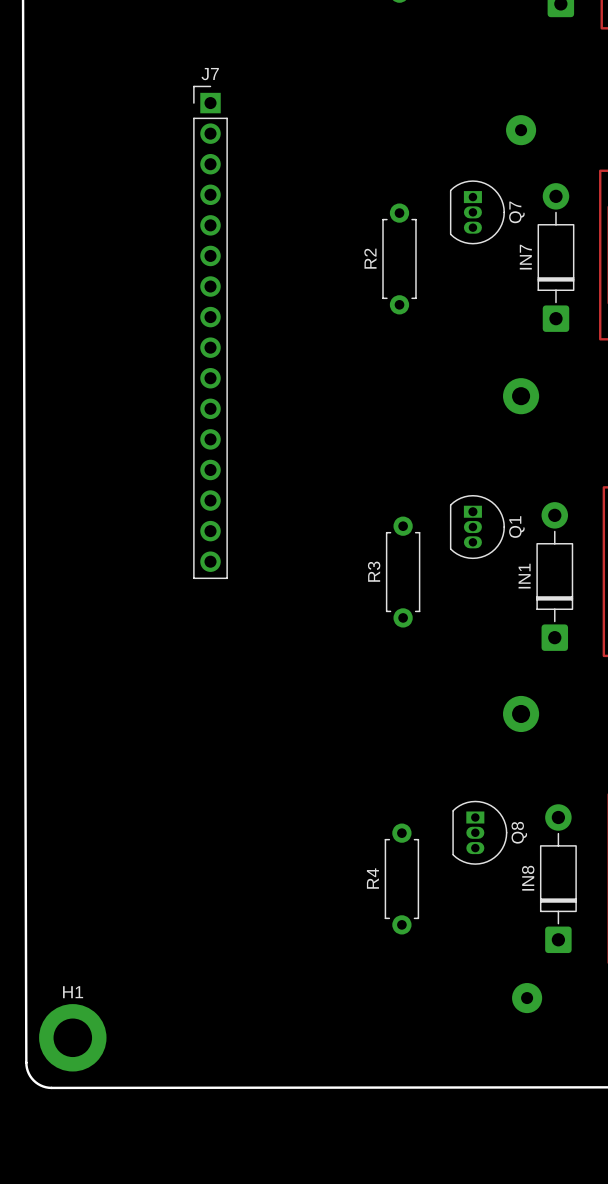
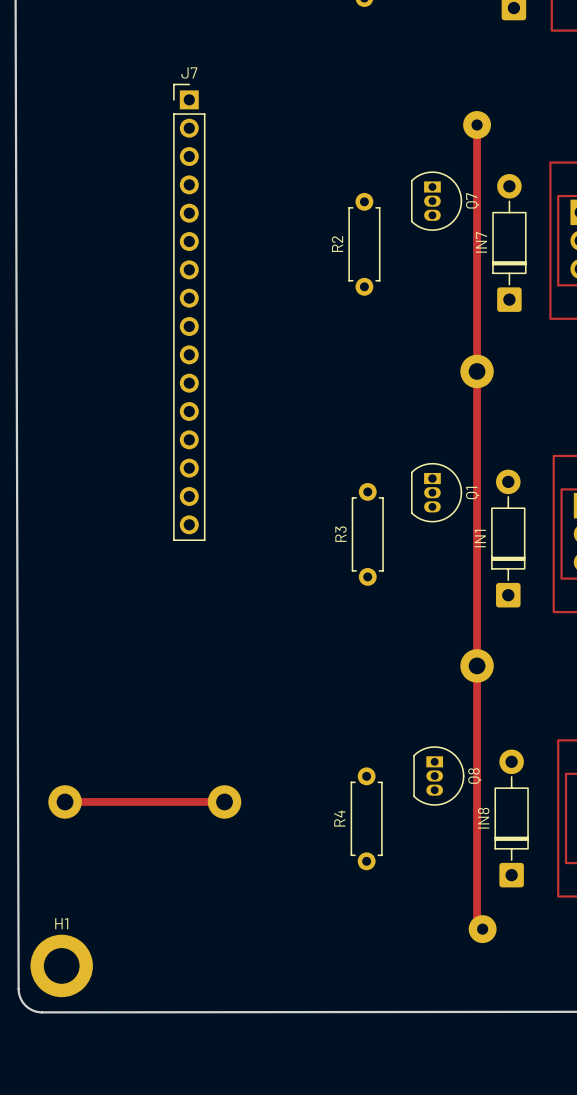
track: none -> (477, 124) (477, 923) (482, 929)
track: none -> (65, 801) (224, 801)
part: none -> (65, 801)
part: none -> (224, 801)

